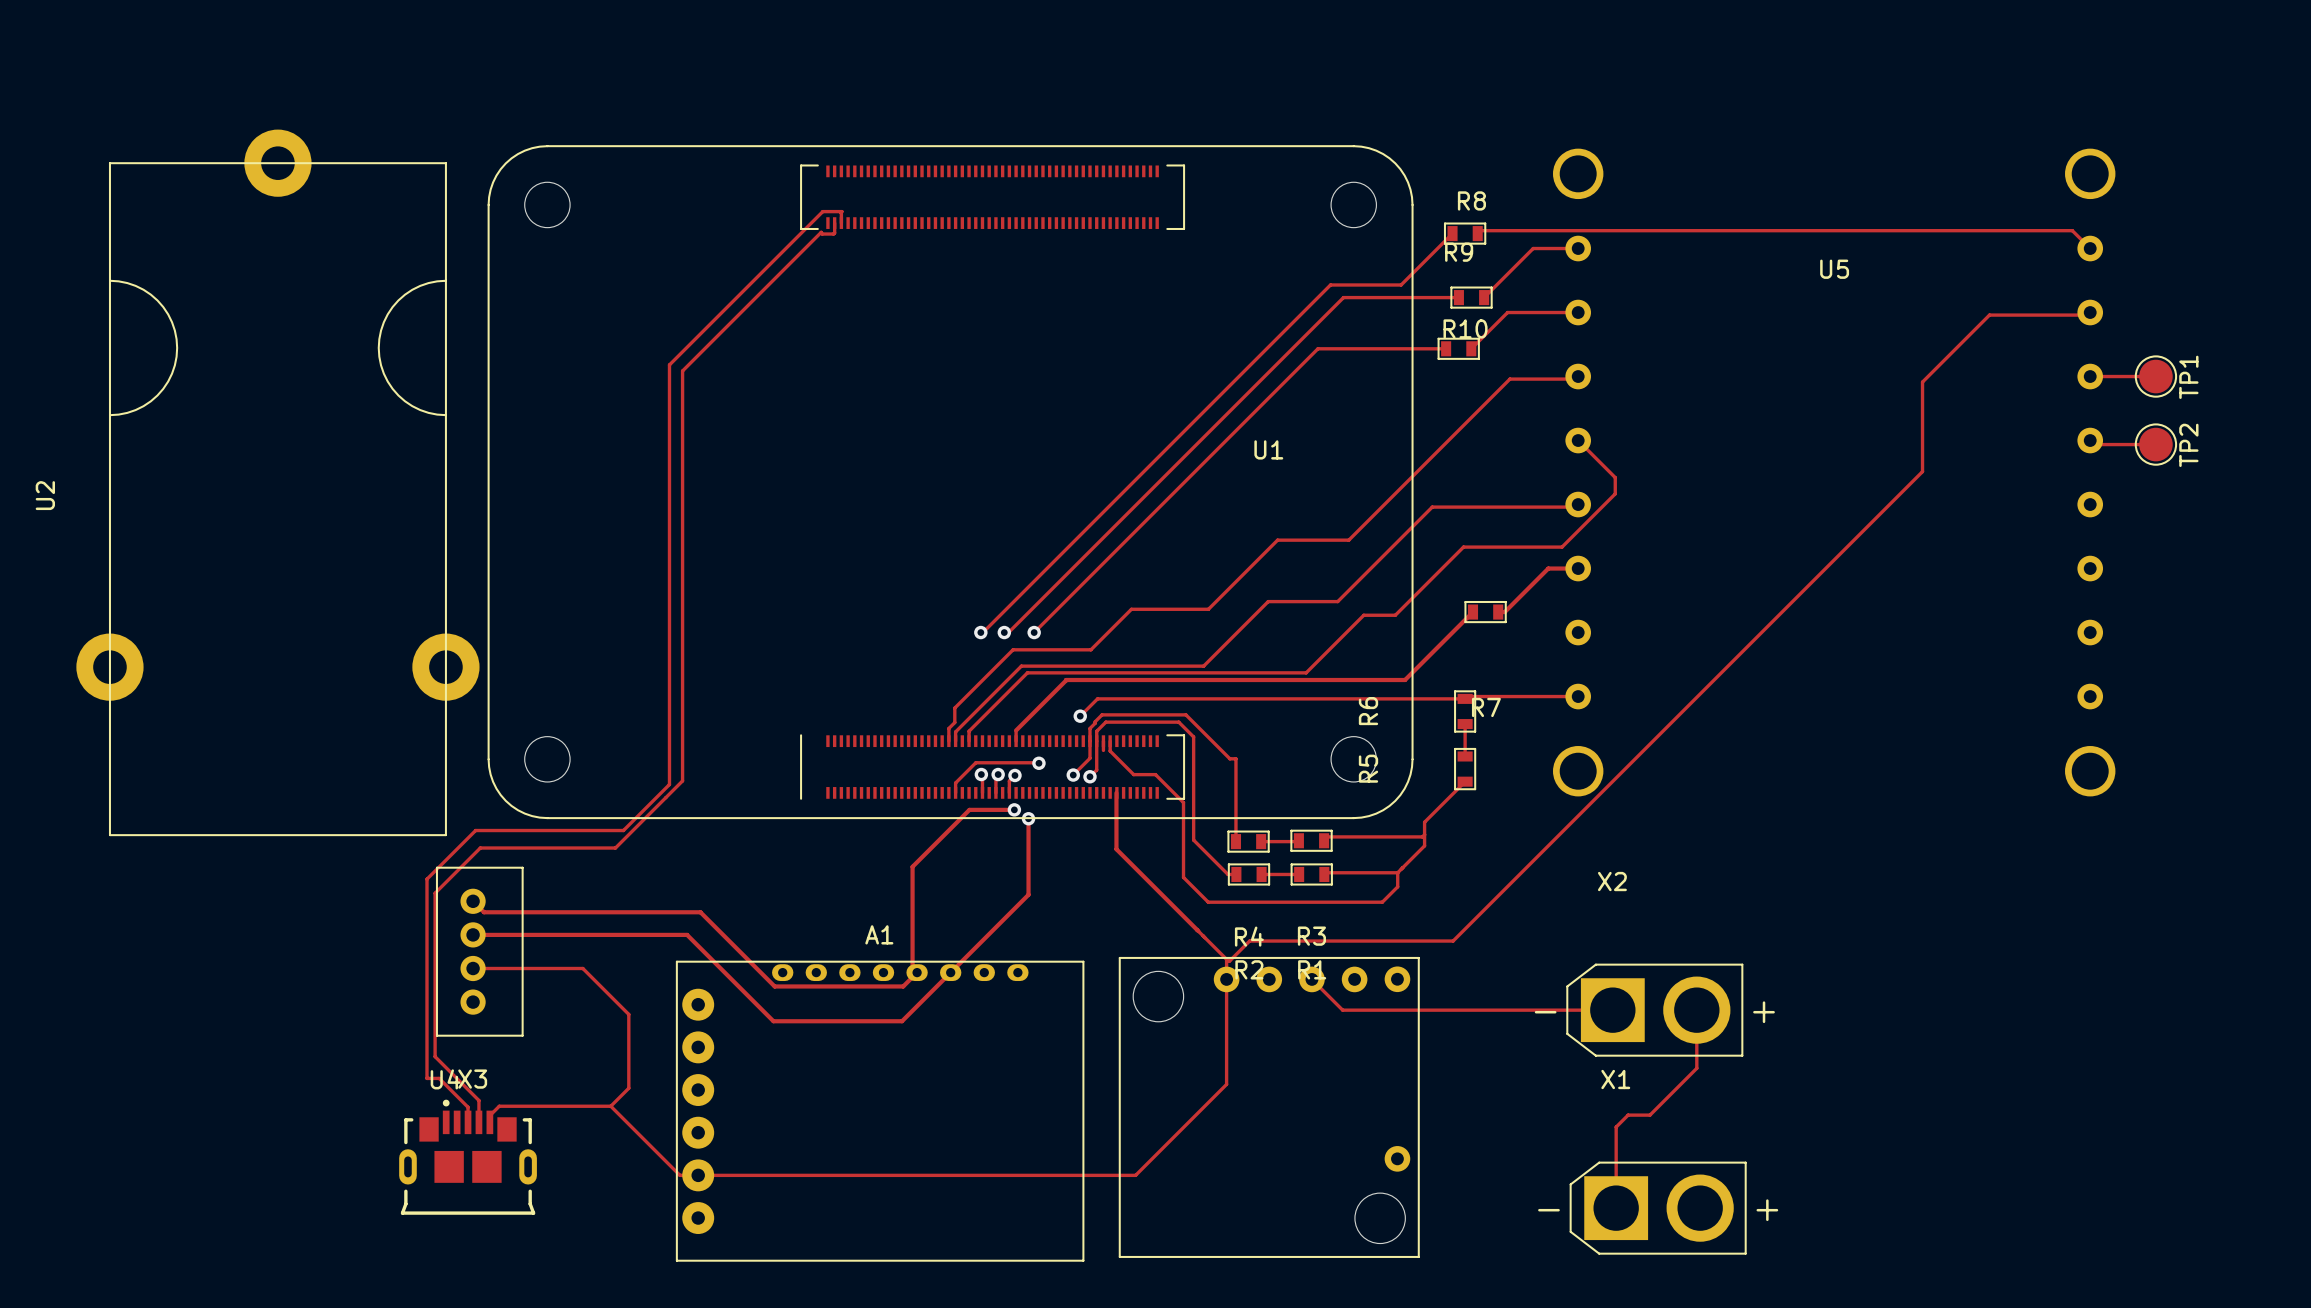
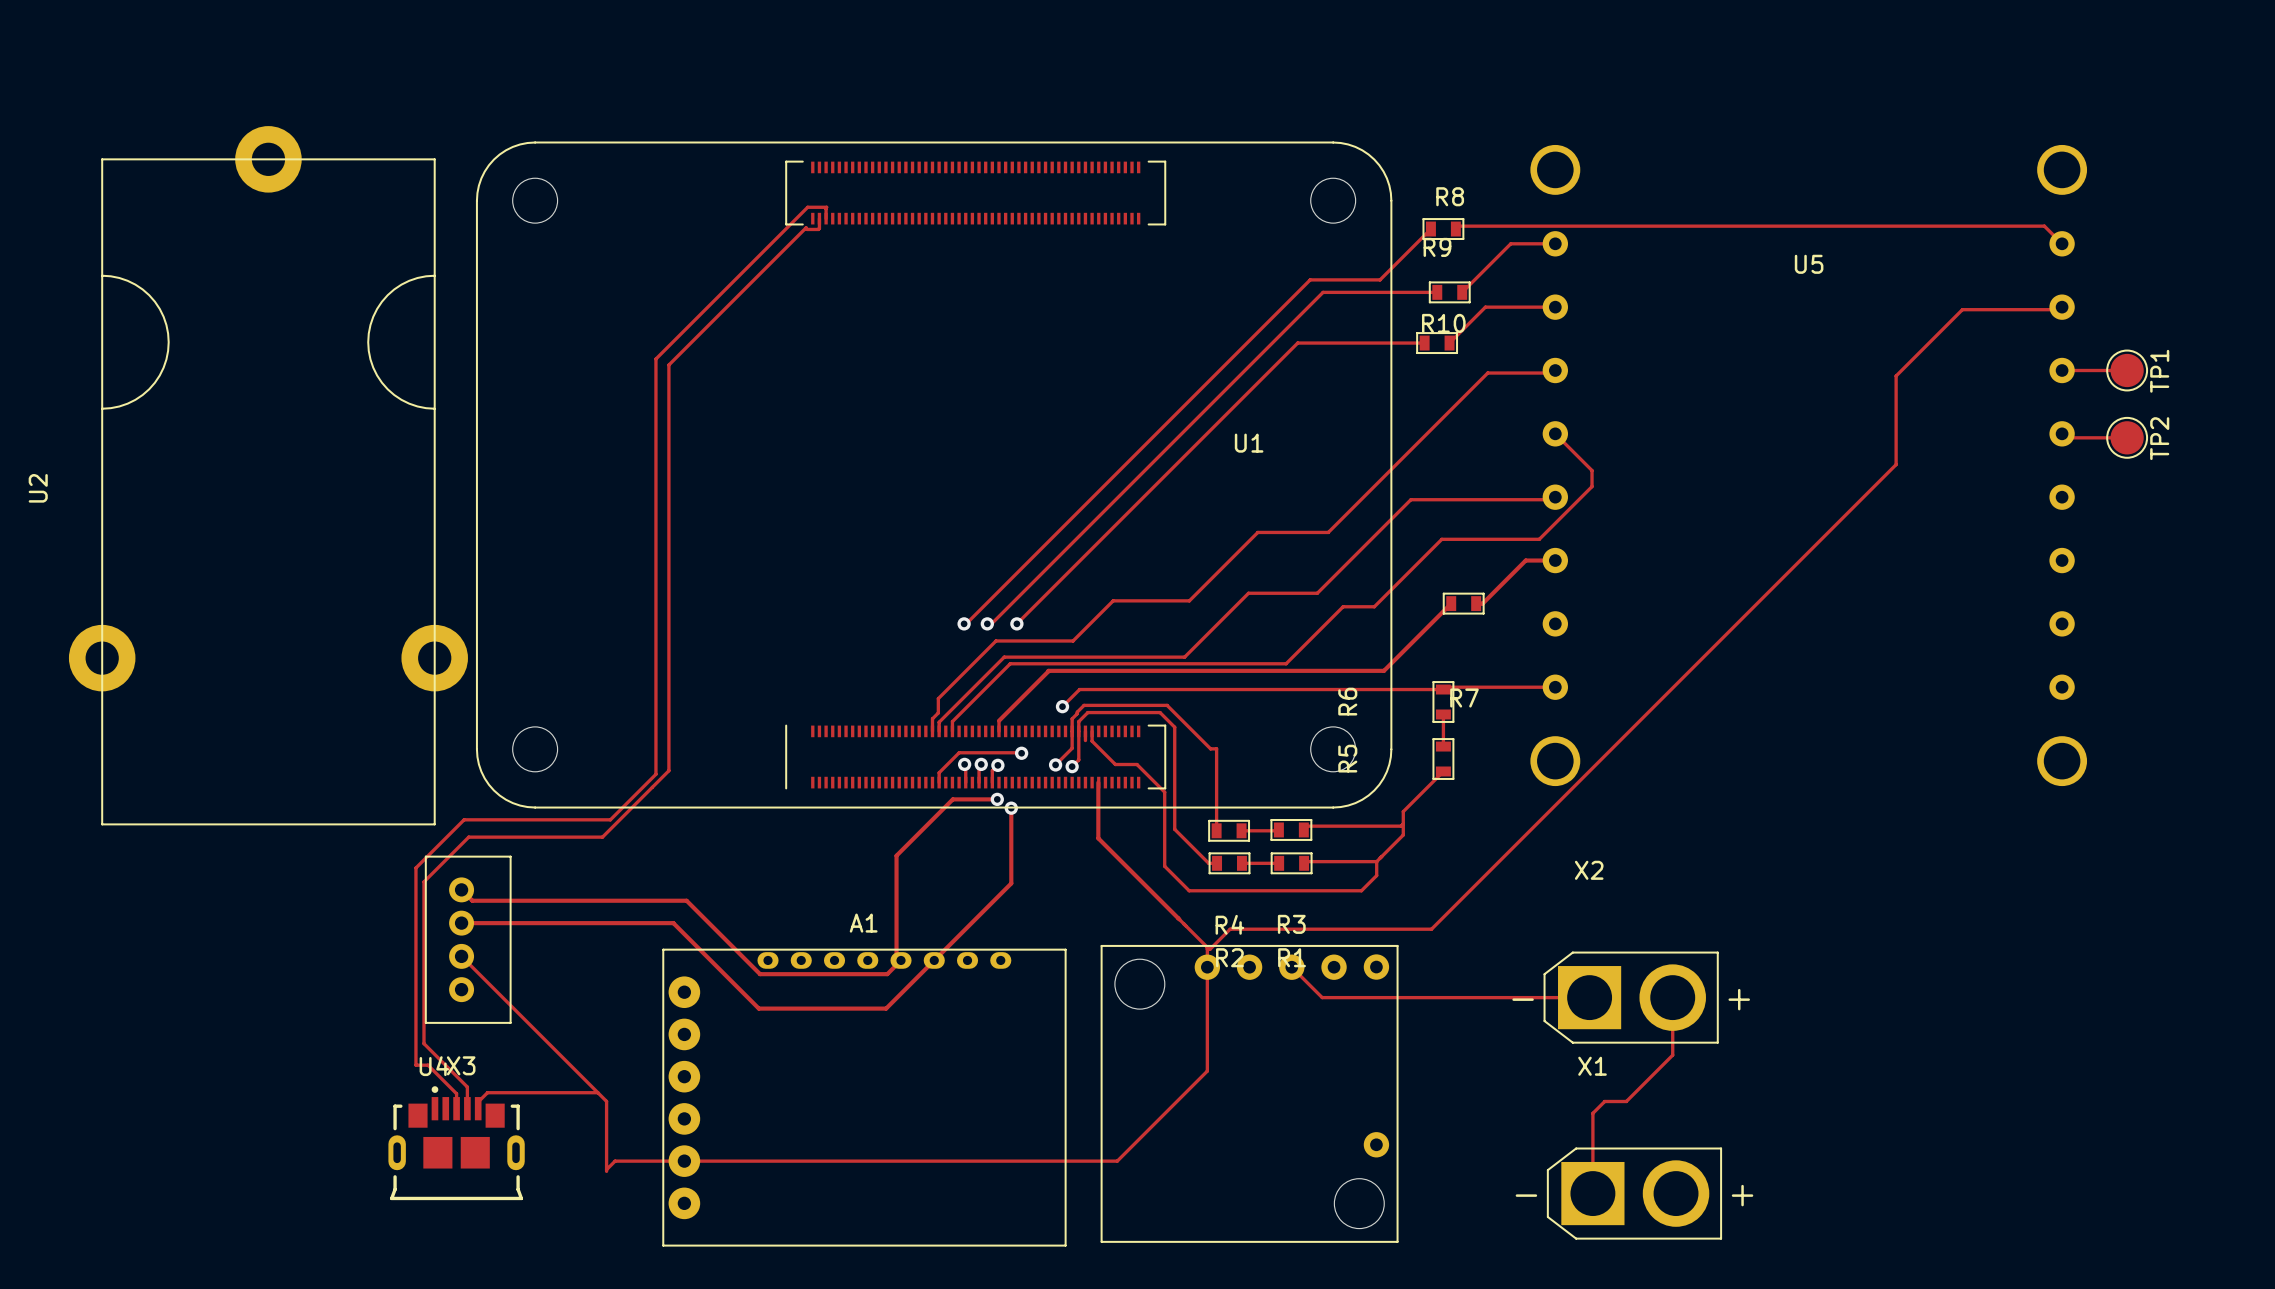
track: (473, 968) (582, 968) (628, 1014) (628, 1088) (610, 1106) -> (461, 956) (597, 1092)
track: (619, 1115) (679, 1175) -> (606, 1101) (606, 1171)
track: none -> (666, 1161) (615, 1161) (606, 1169)

